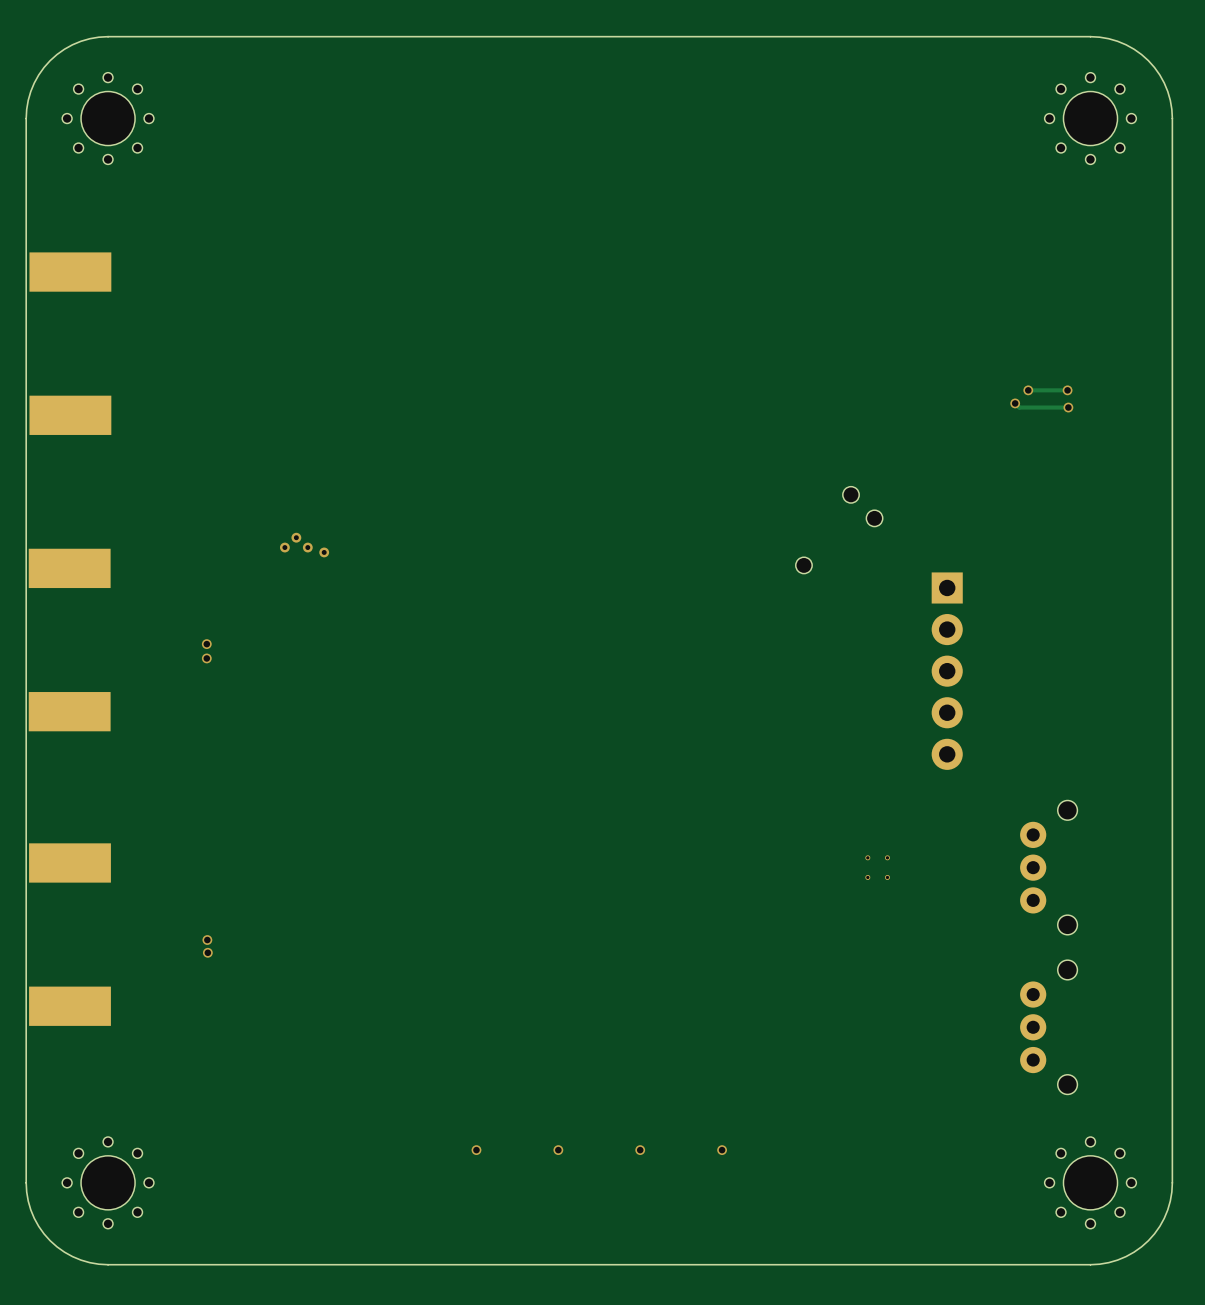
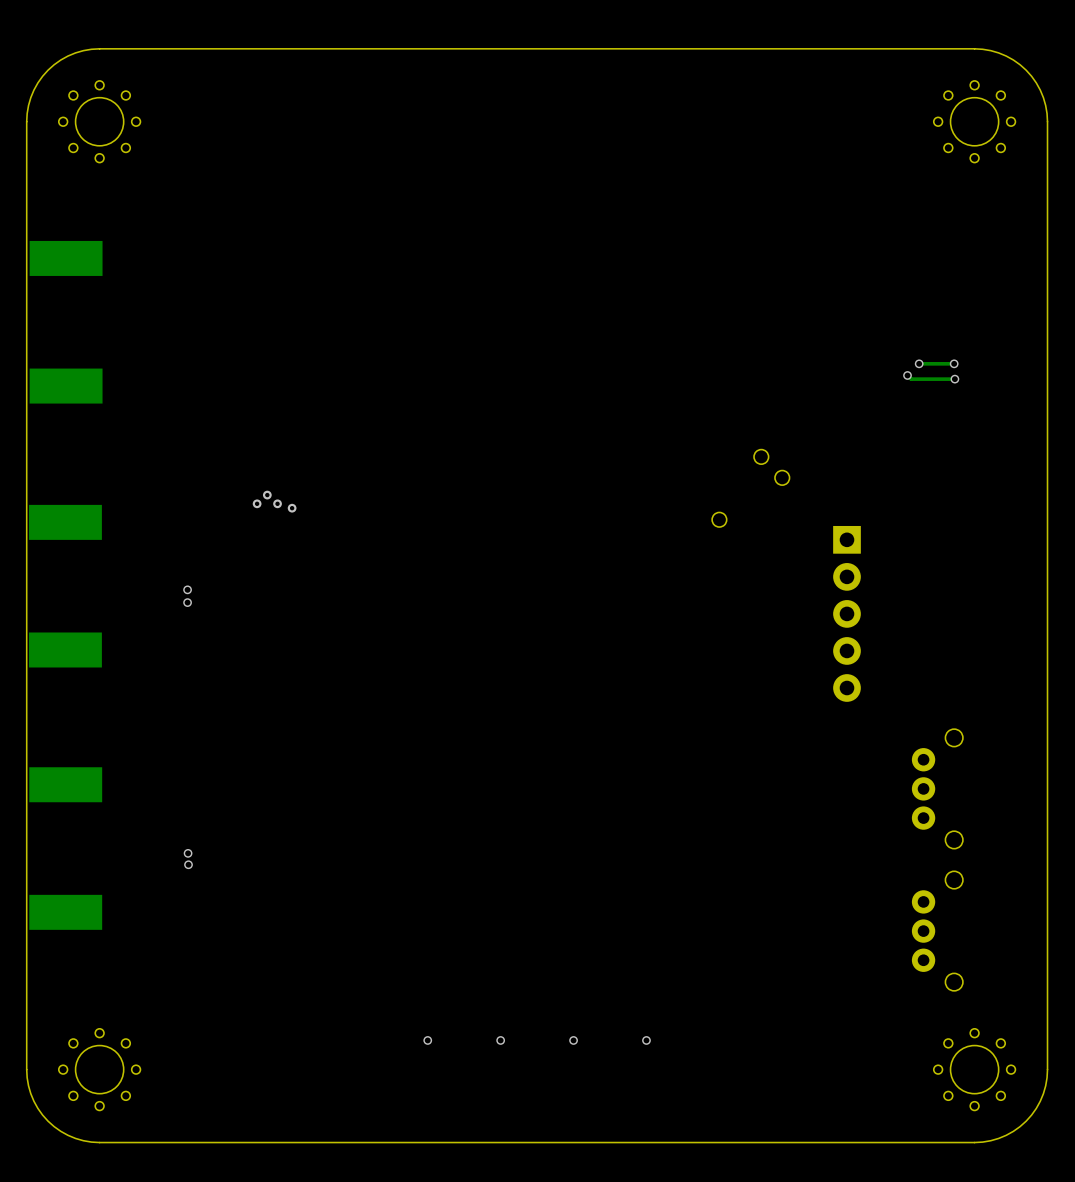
part: (877, 867) -> none

